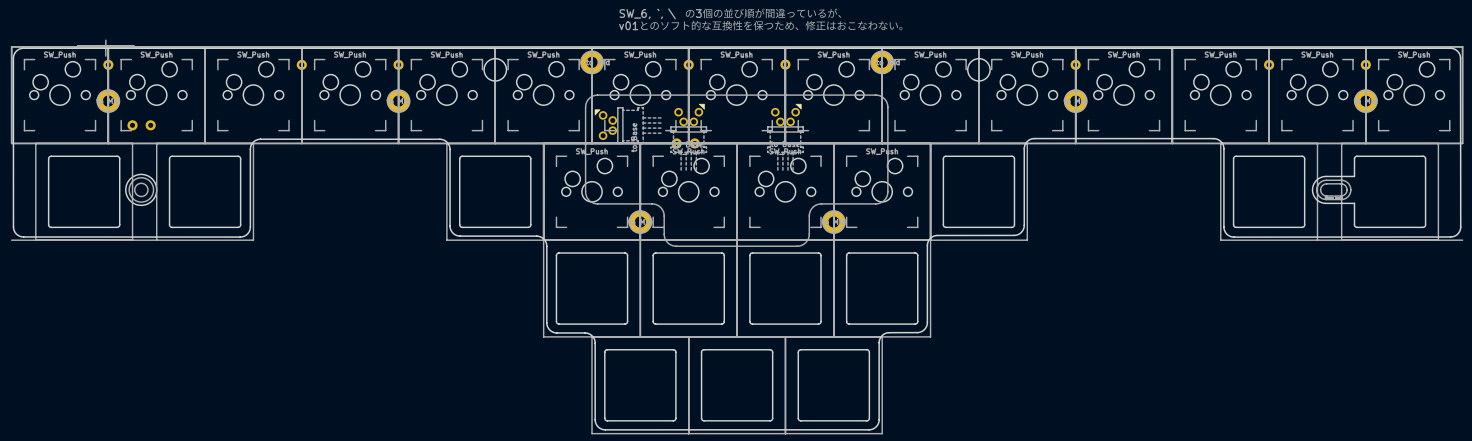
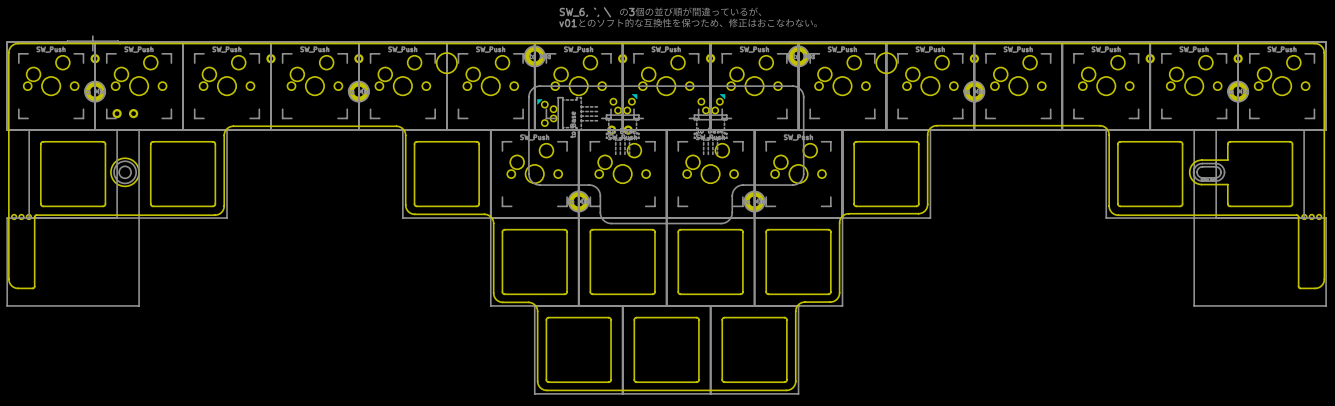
part footprint: [11, 39, 1463, 435] -> [6, 35, 1327, 395]

